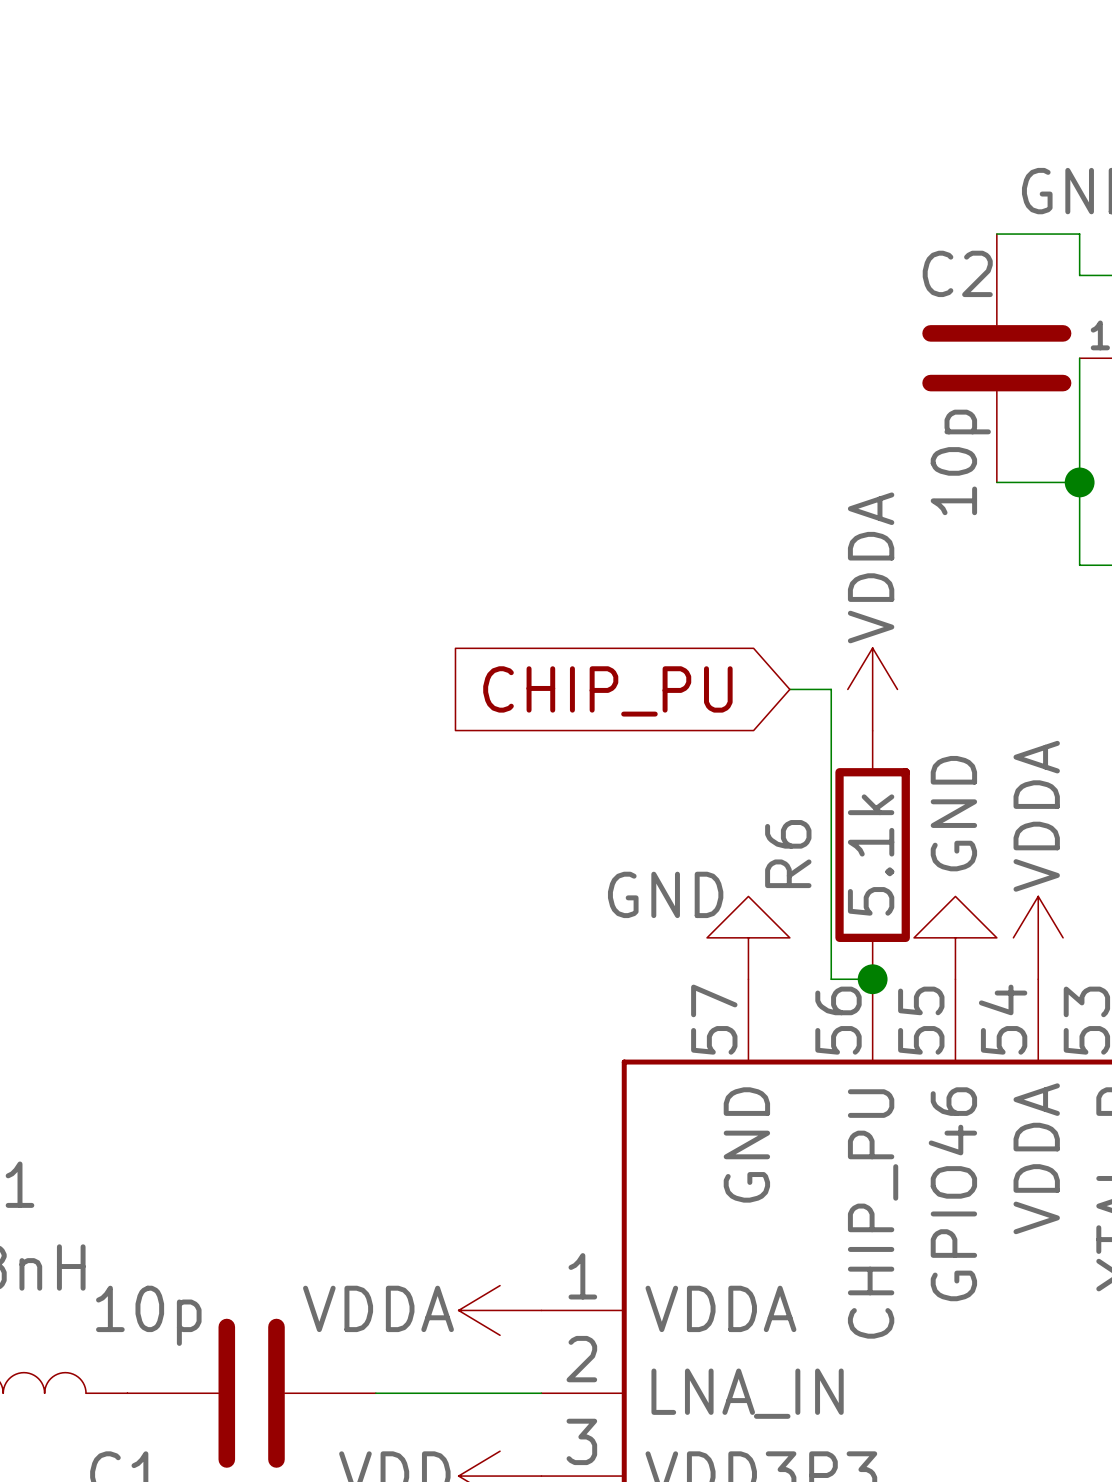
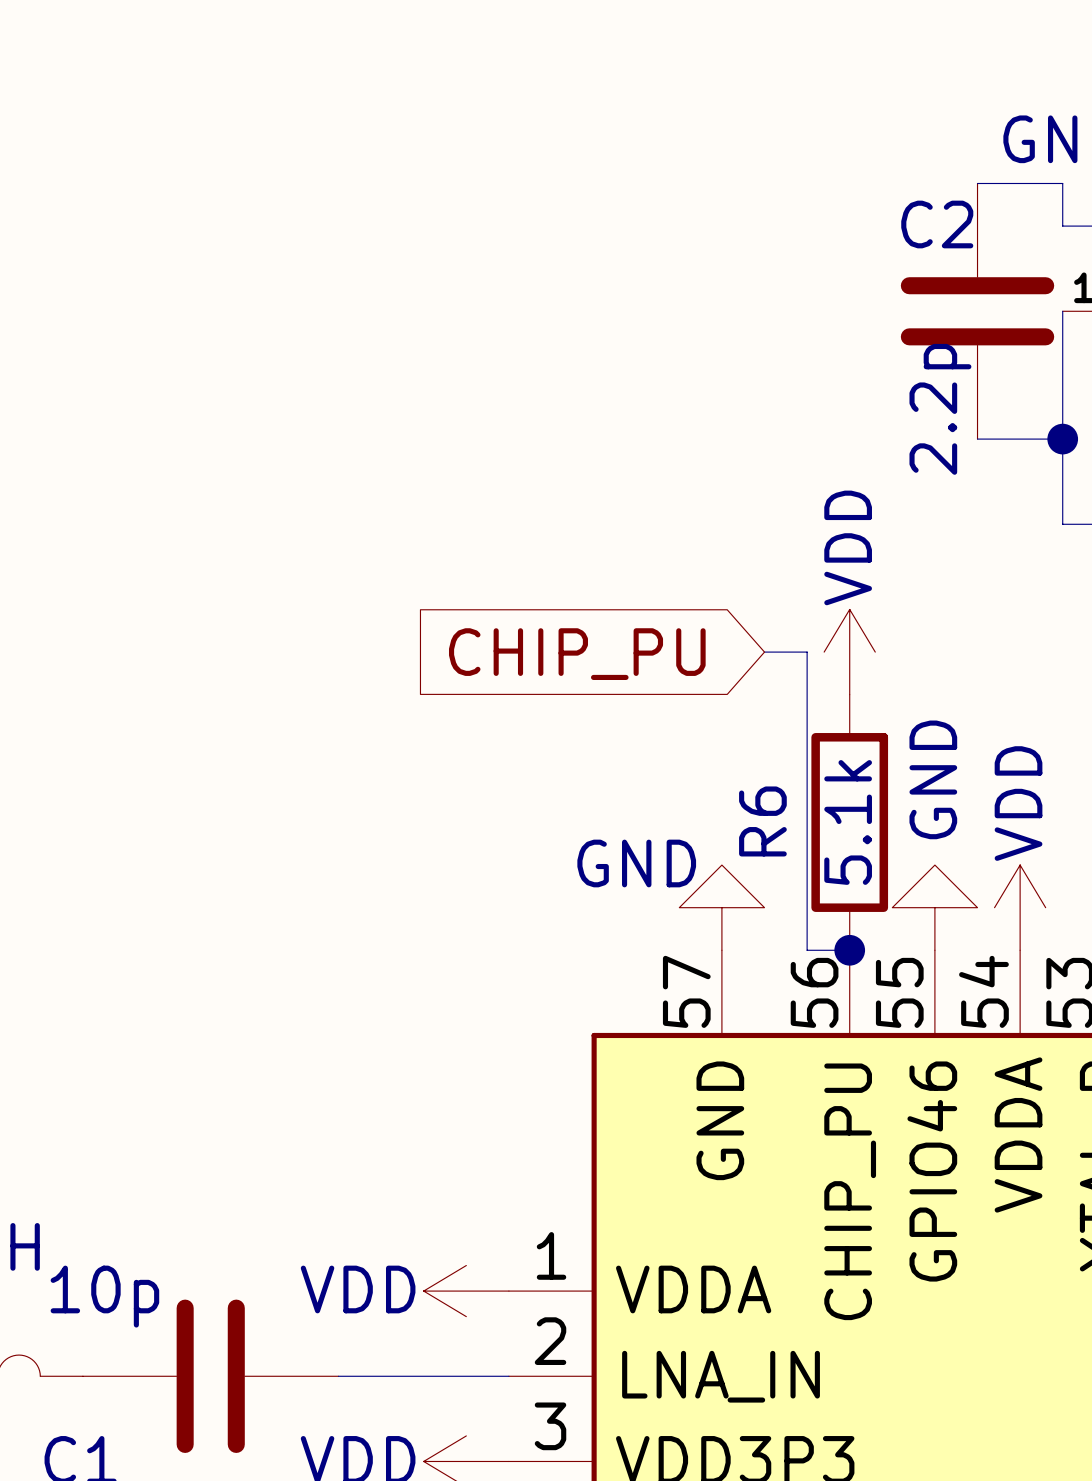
C2 value: 10p (960, 462) -> 2.2p (940, 409)
power symbol: VDDA (872, 689) -> VDD (849, 652)
power symbol: VDDA (1038, 937) -> VDD (1020, 907)
power symbol: VDDA (500, 1310) -> VDD (466, 1291)

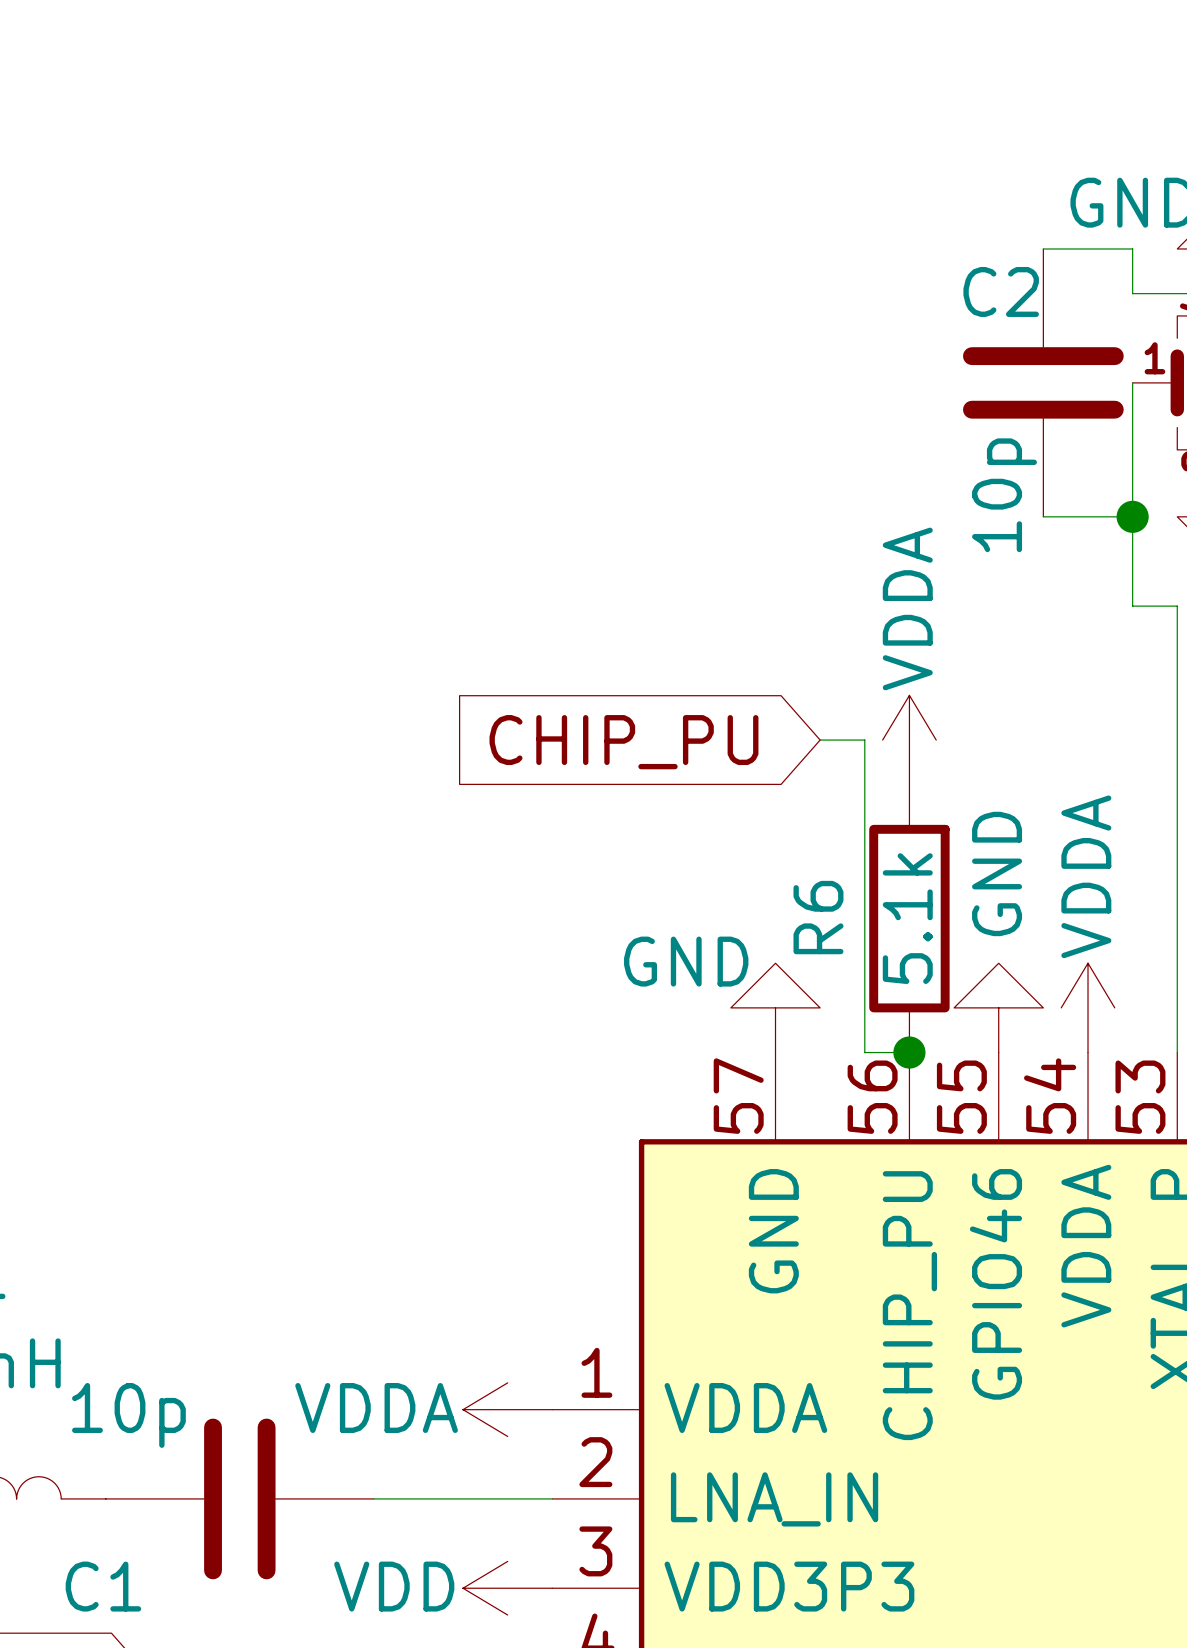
C2 value: 2.2p (940, 409) -> 10p (1004, 495)
power symbol: VDD (849, 652) -> VDDA (909, 740)
power symbol: VDD (1020, 907) -> VDDA (1088, 1007)
power symbol: VDD (466, 1291) -> VDDA (507, 1409)

